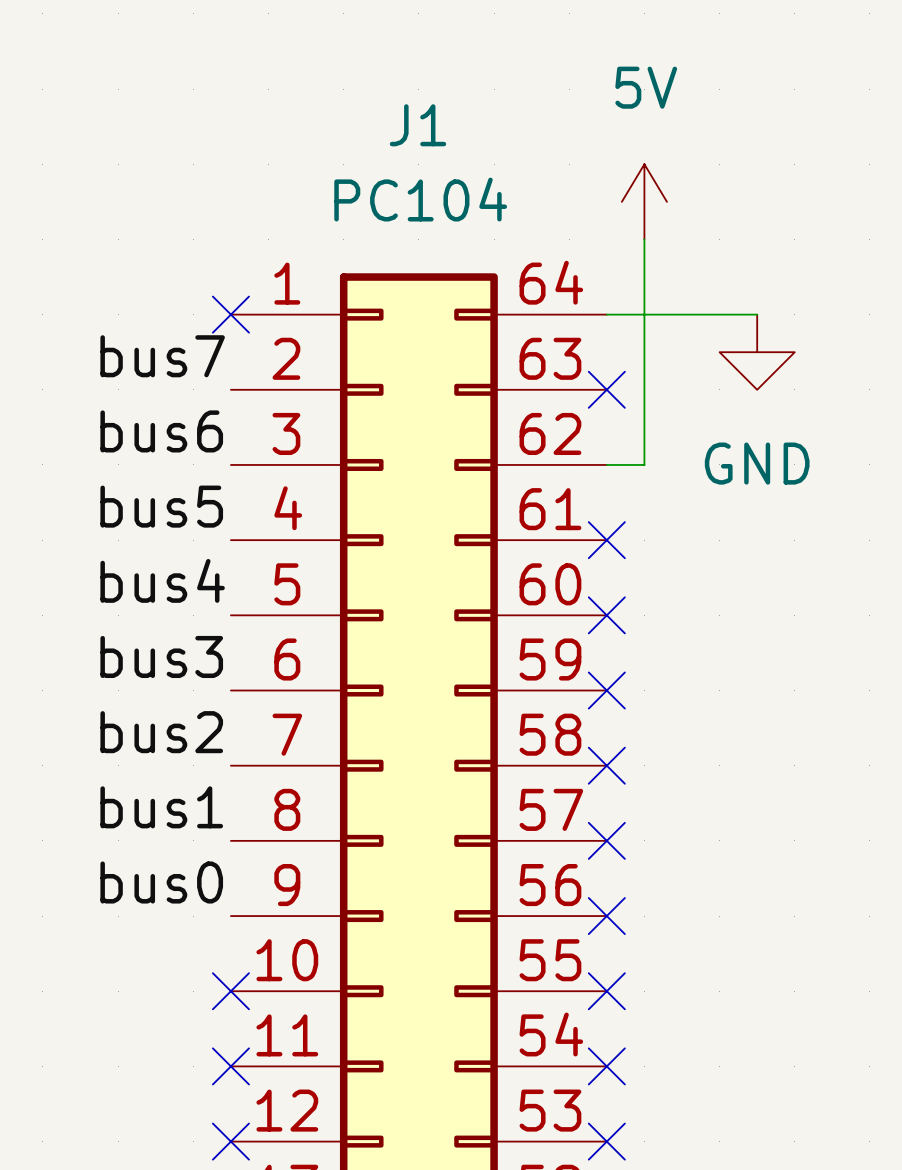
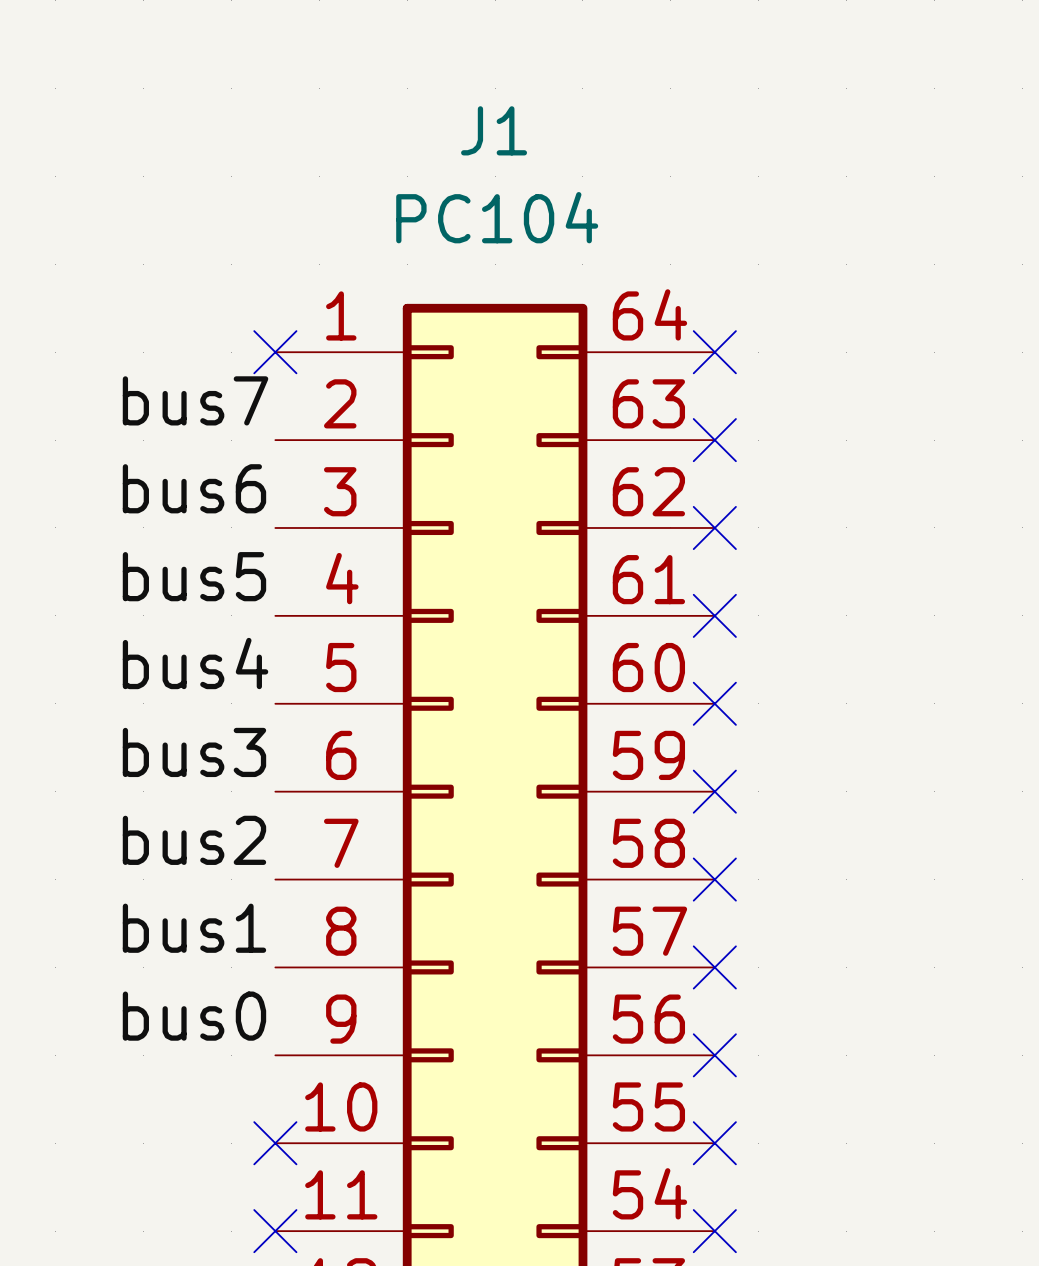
power symbol: 5V (644, 201) -> none
wire: (644, 239) (644, 464) (606, 464) -> none
wire: (606, 314) (757, 314) -> none
no-connect mark: none -> (714, 352)
power symbol: GND (757, 352) -> none
no-connect mark: none -> (714, 527)

